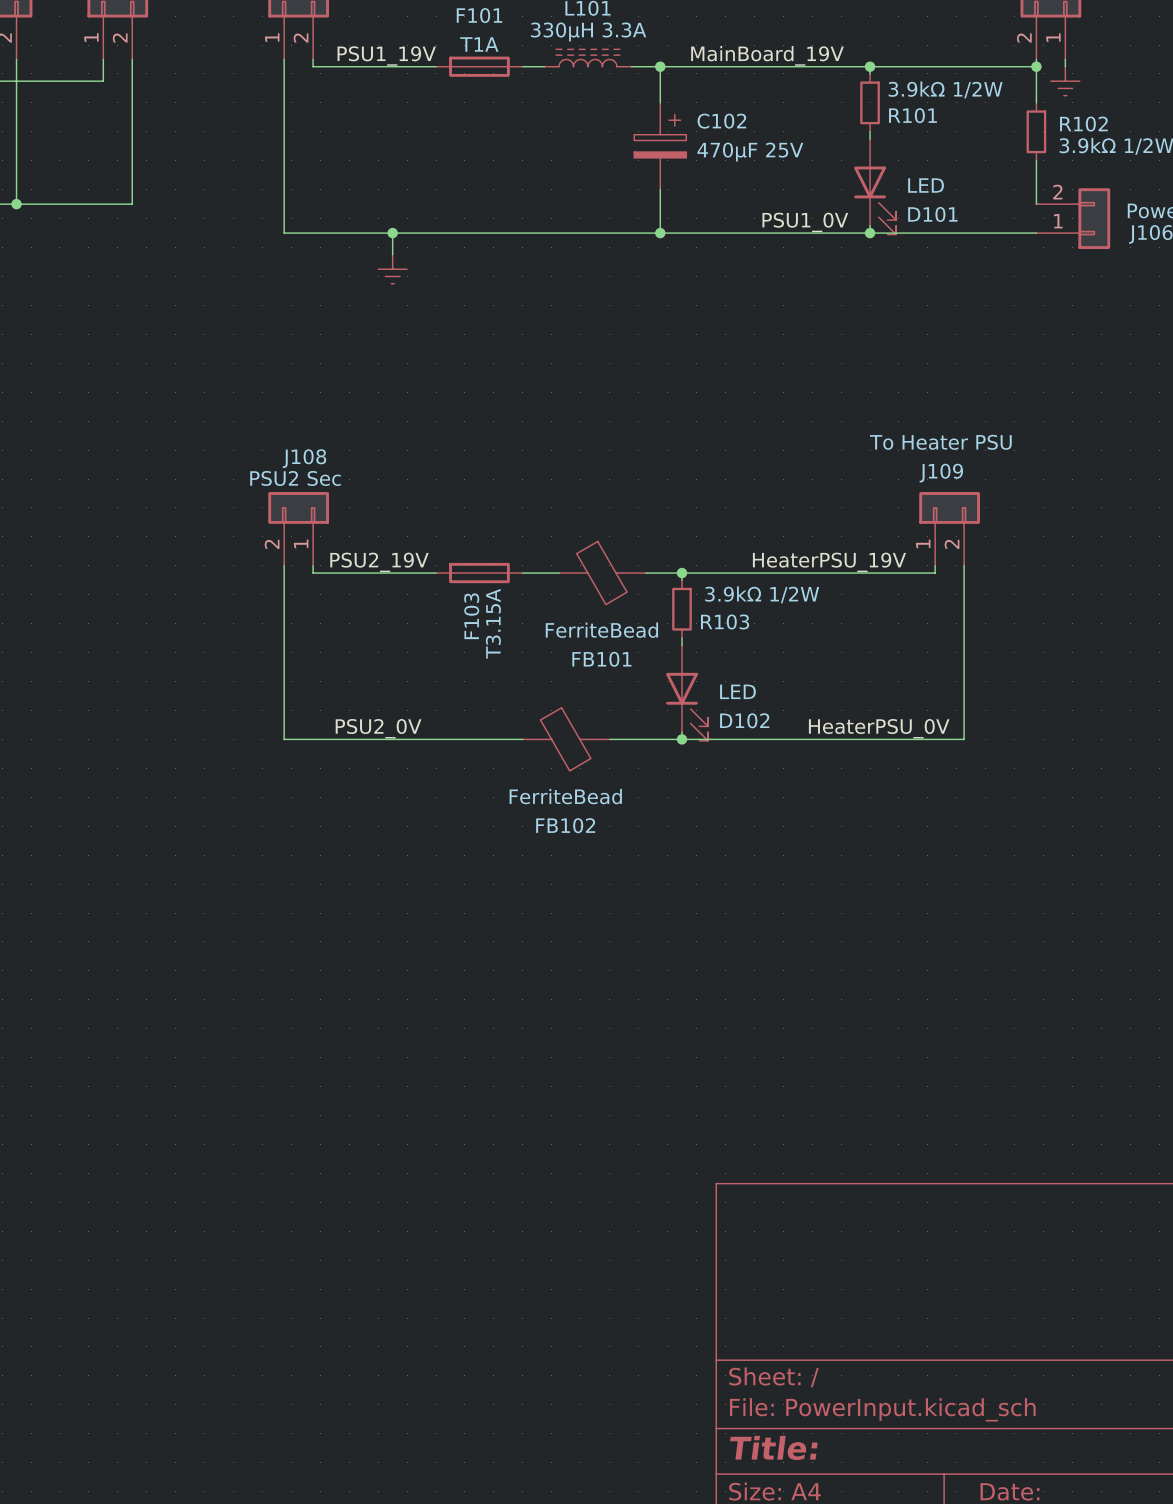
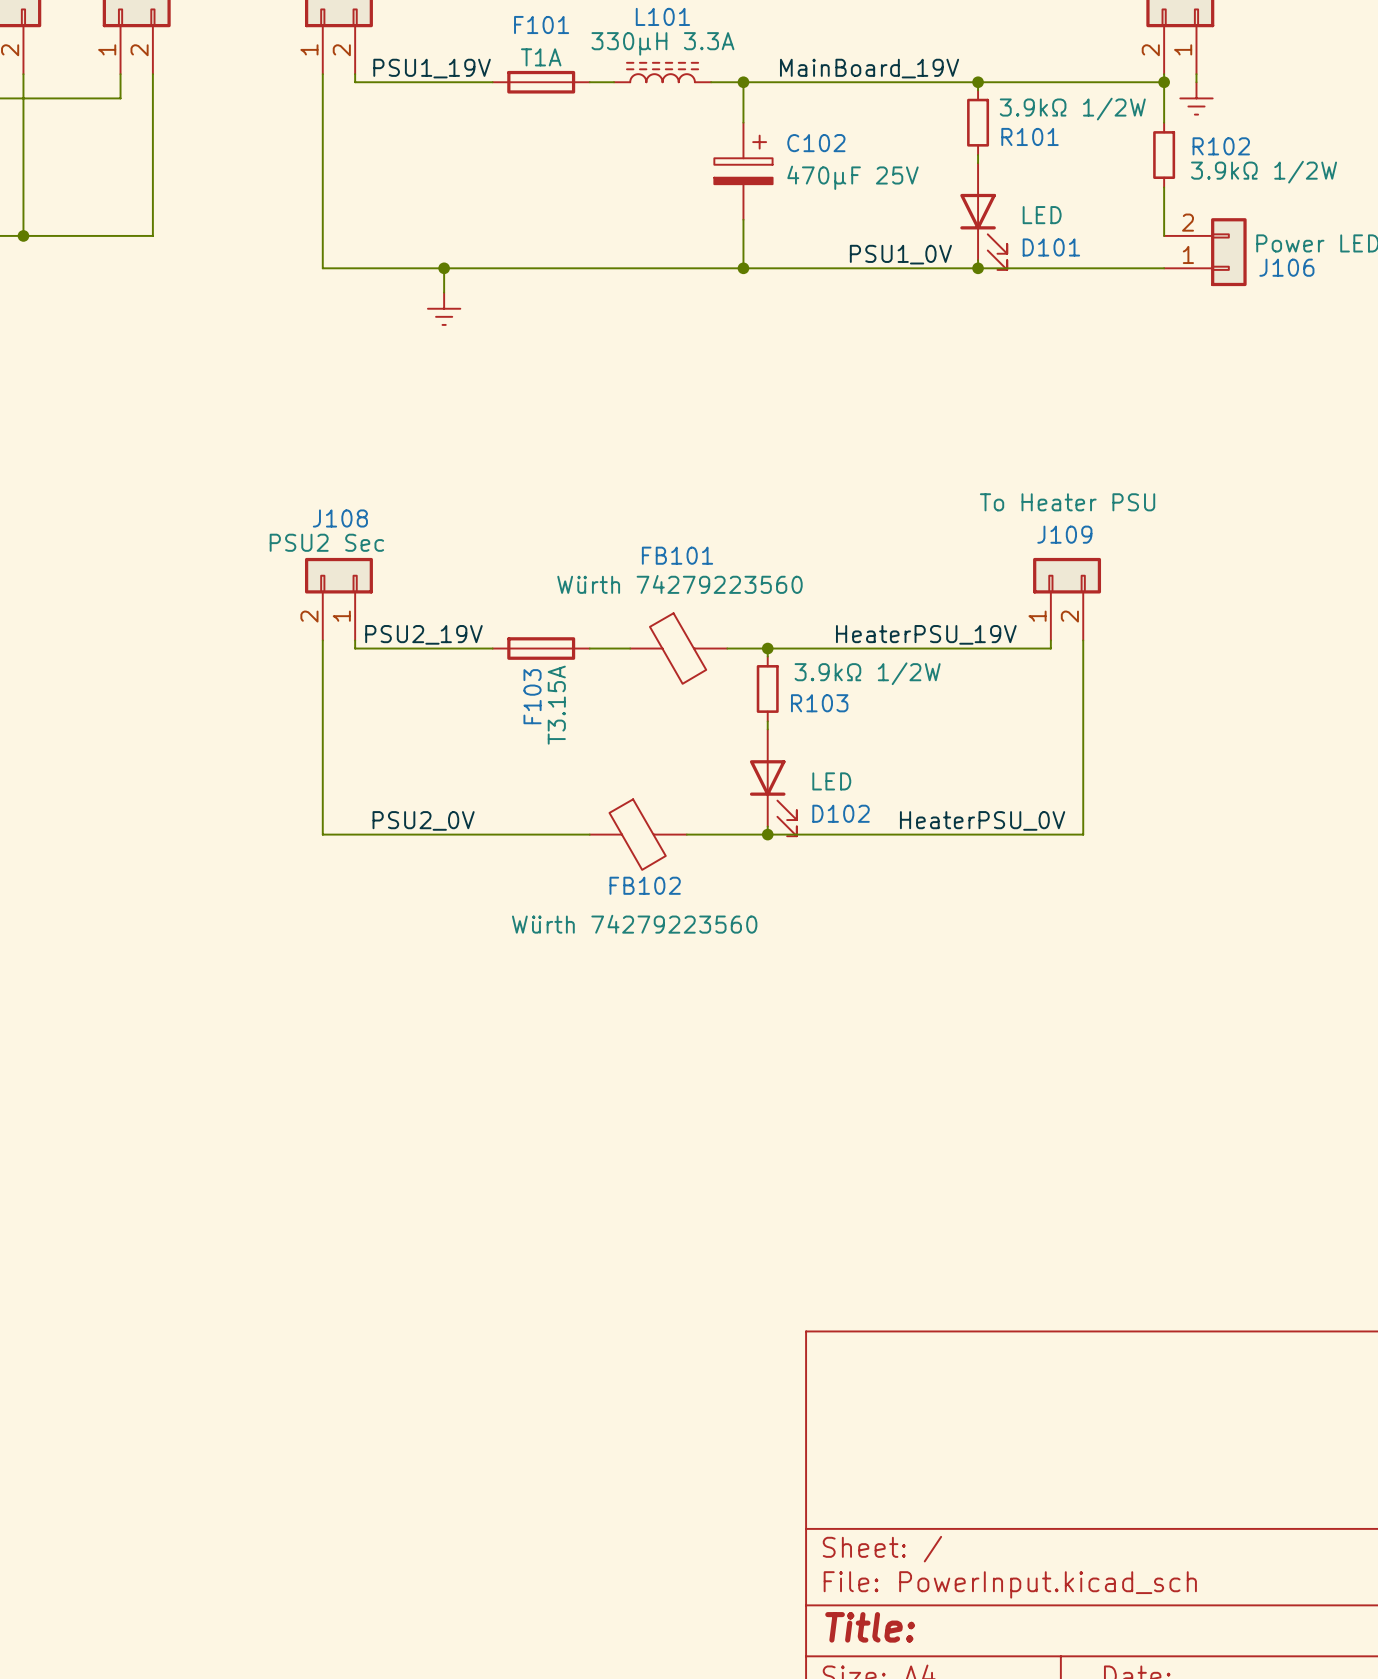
FB101 value: FerriteBead (601, 630) -> Würth 74279223560 (679, 584)
FB101 name position: FB101 (601, 659) -> FB101 (677, 555)
FB102 value: FerriteBead (565, 796) -> Würth 74279223560 (634, 924)
FB102 name position: FB102 (565, 825) -> FB102 (645, 885)

